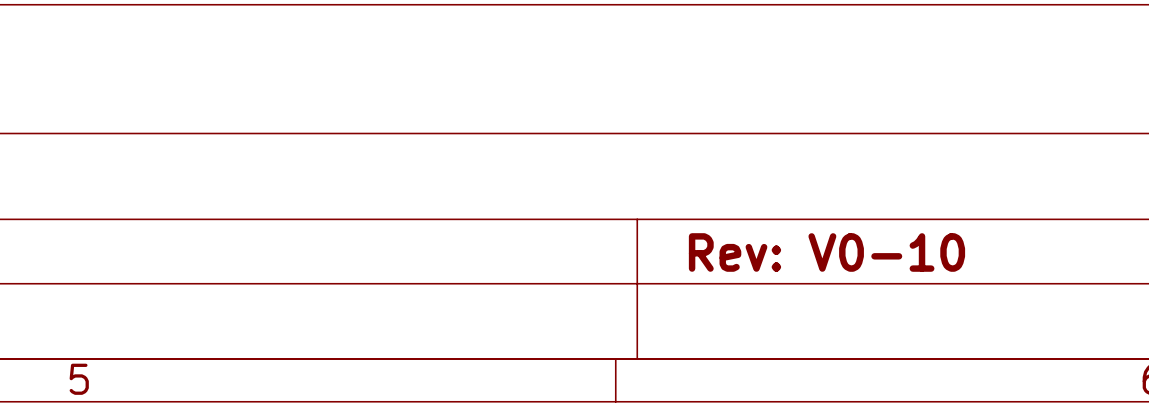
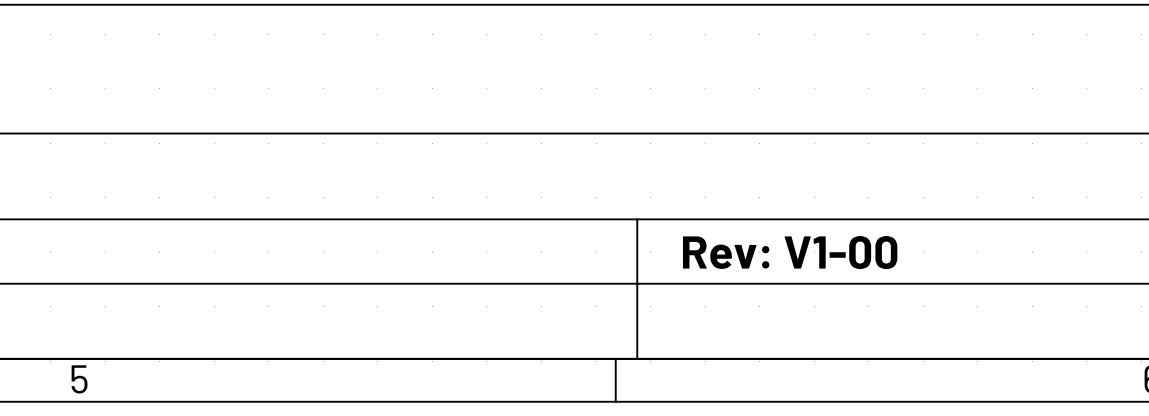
title block: Rev: V0-10 (826, 252) -> Rev: V1-00 (790, 252)

